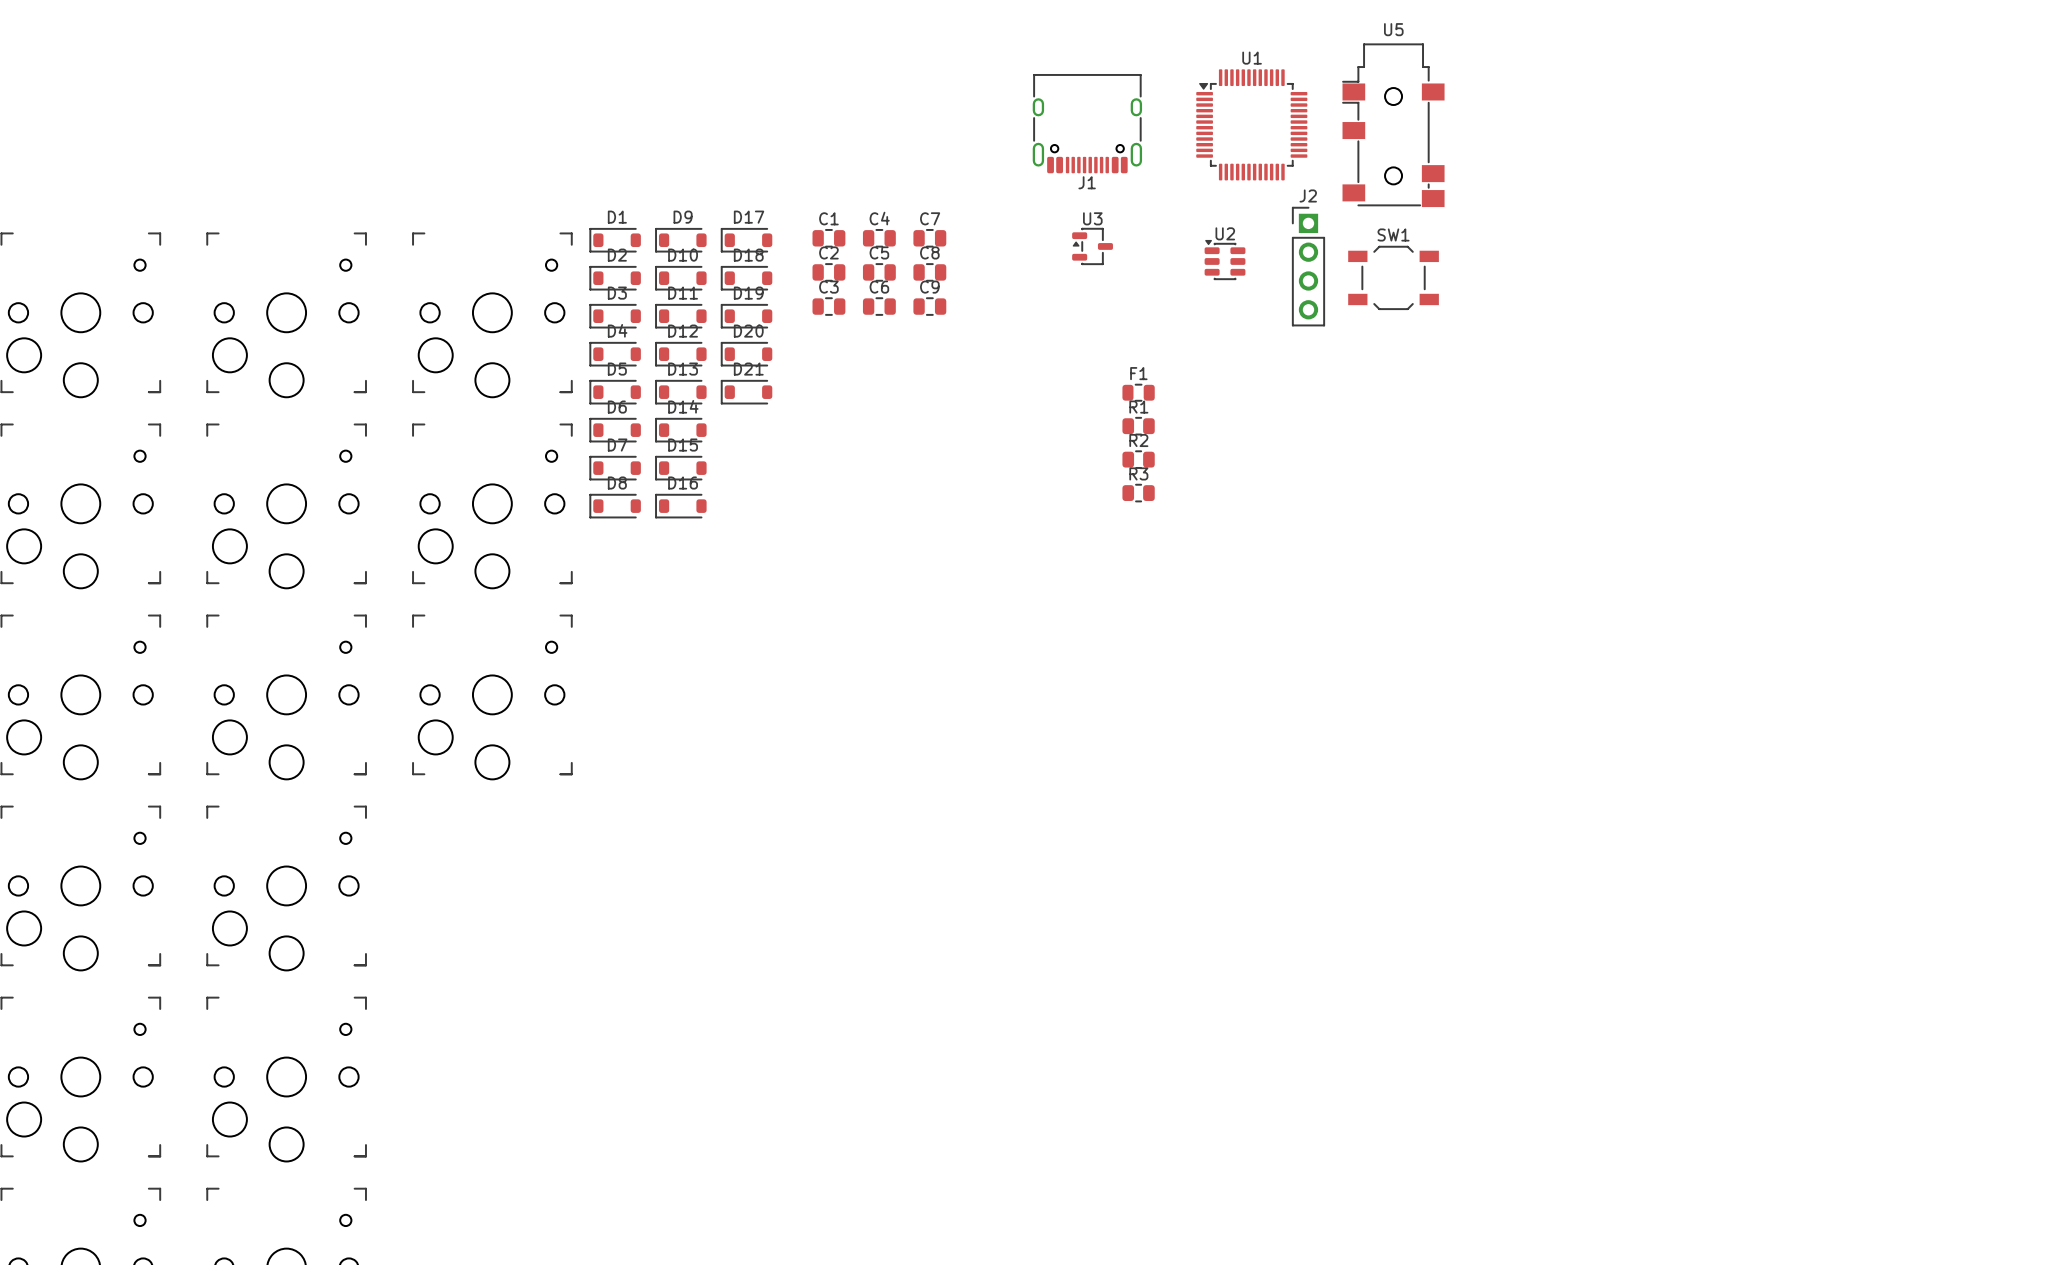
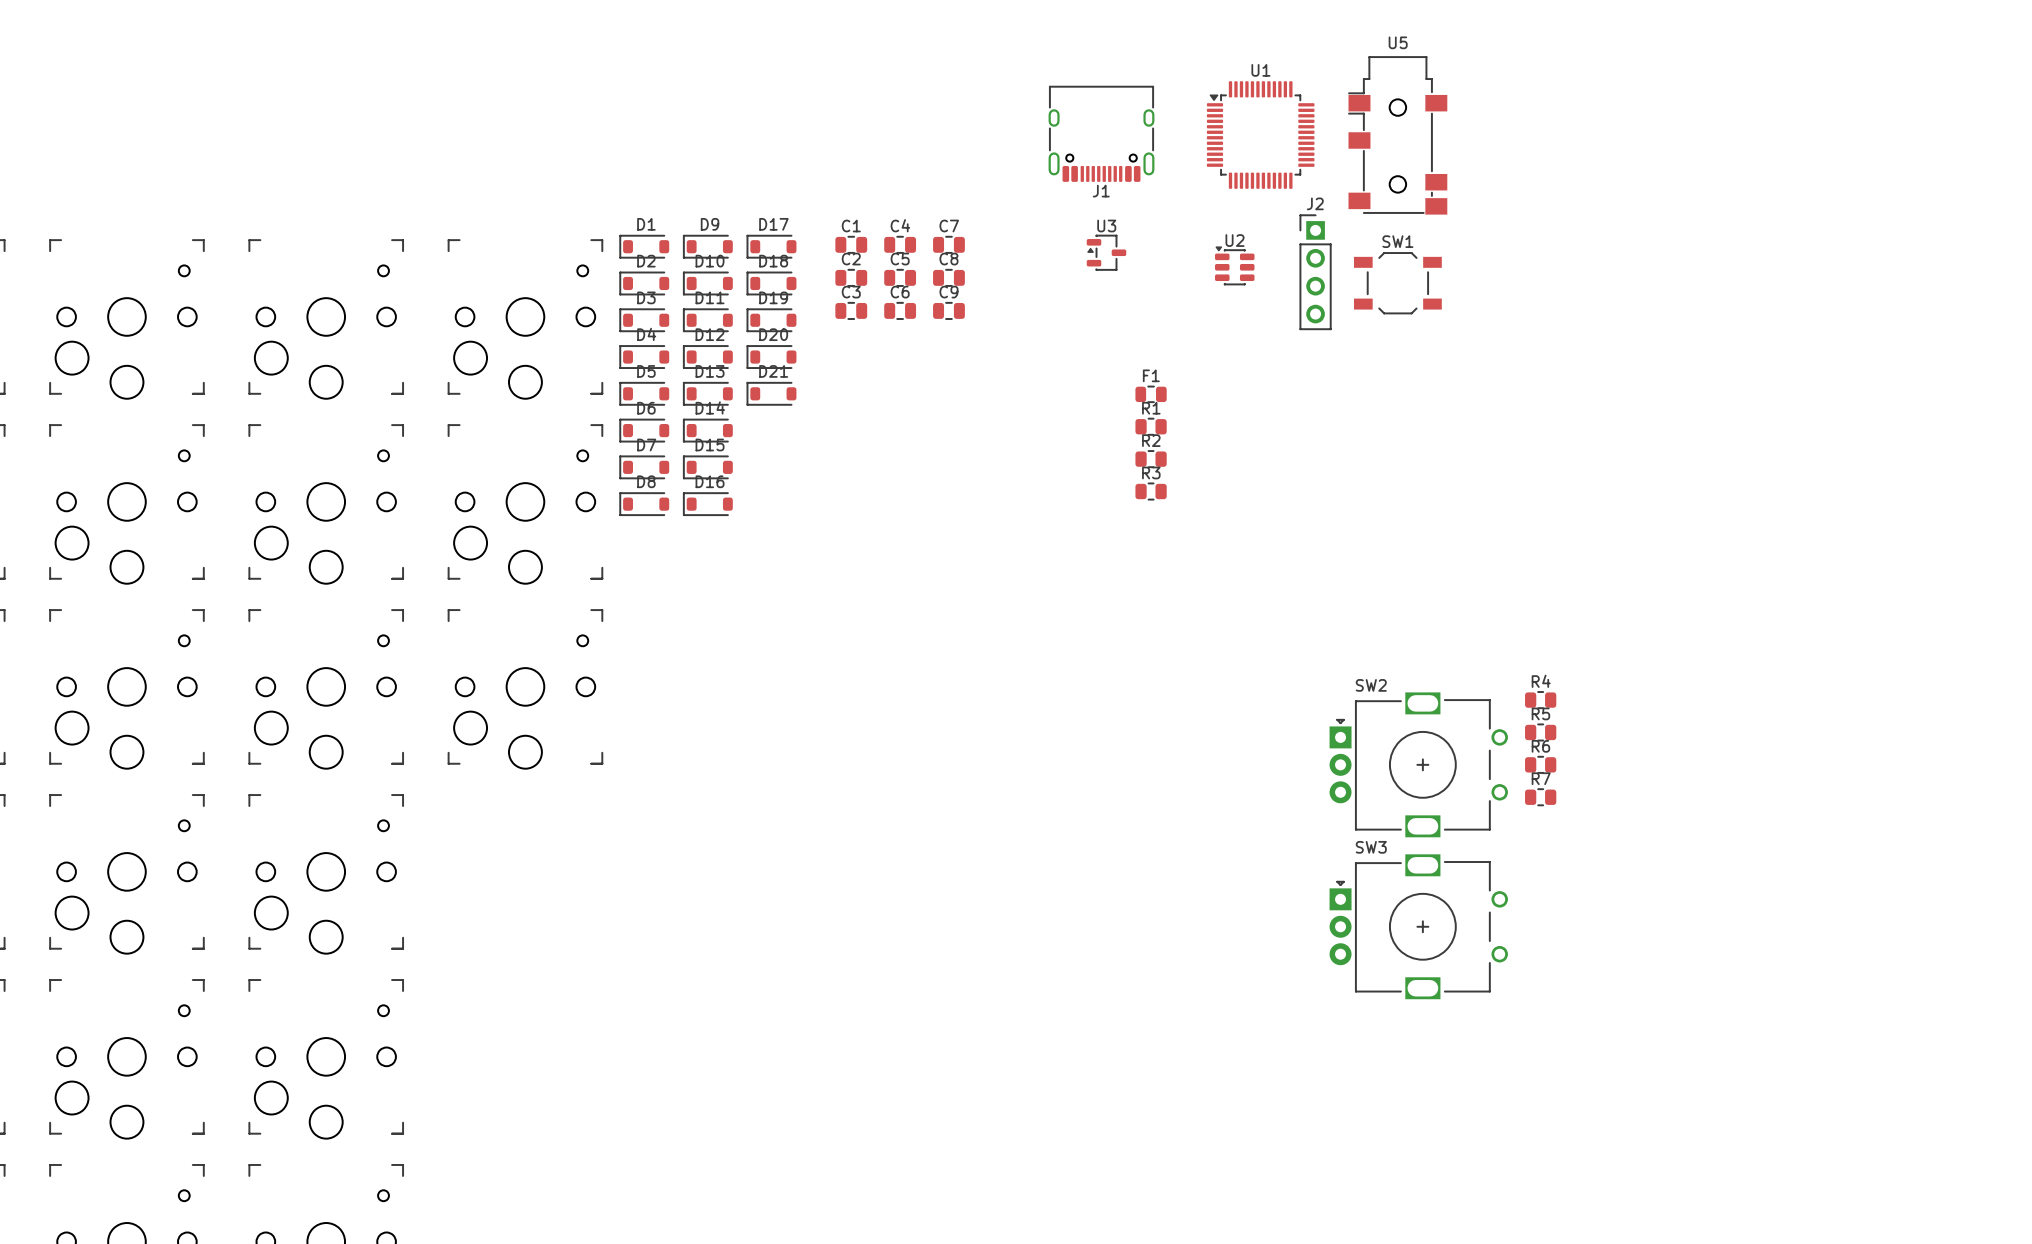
R4: none -> (1540, 700)
R5: none -> (1540, 732)
SW2: none -> (1418, 764)
R6: none -> (1540, 764)
R7: none -> (1540, 797)
SW3: none -> (1418, 926)

